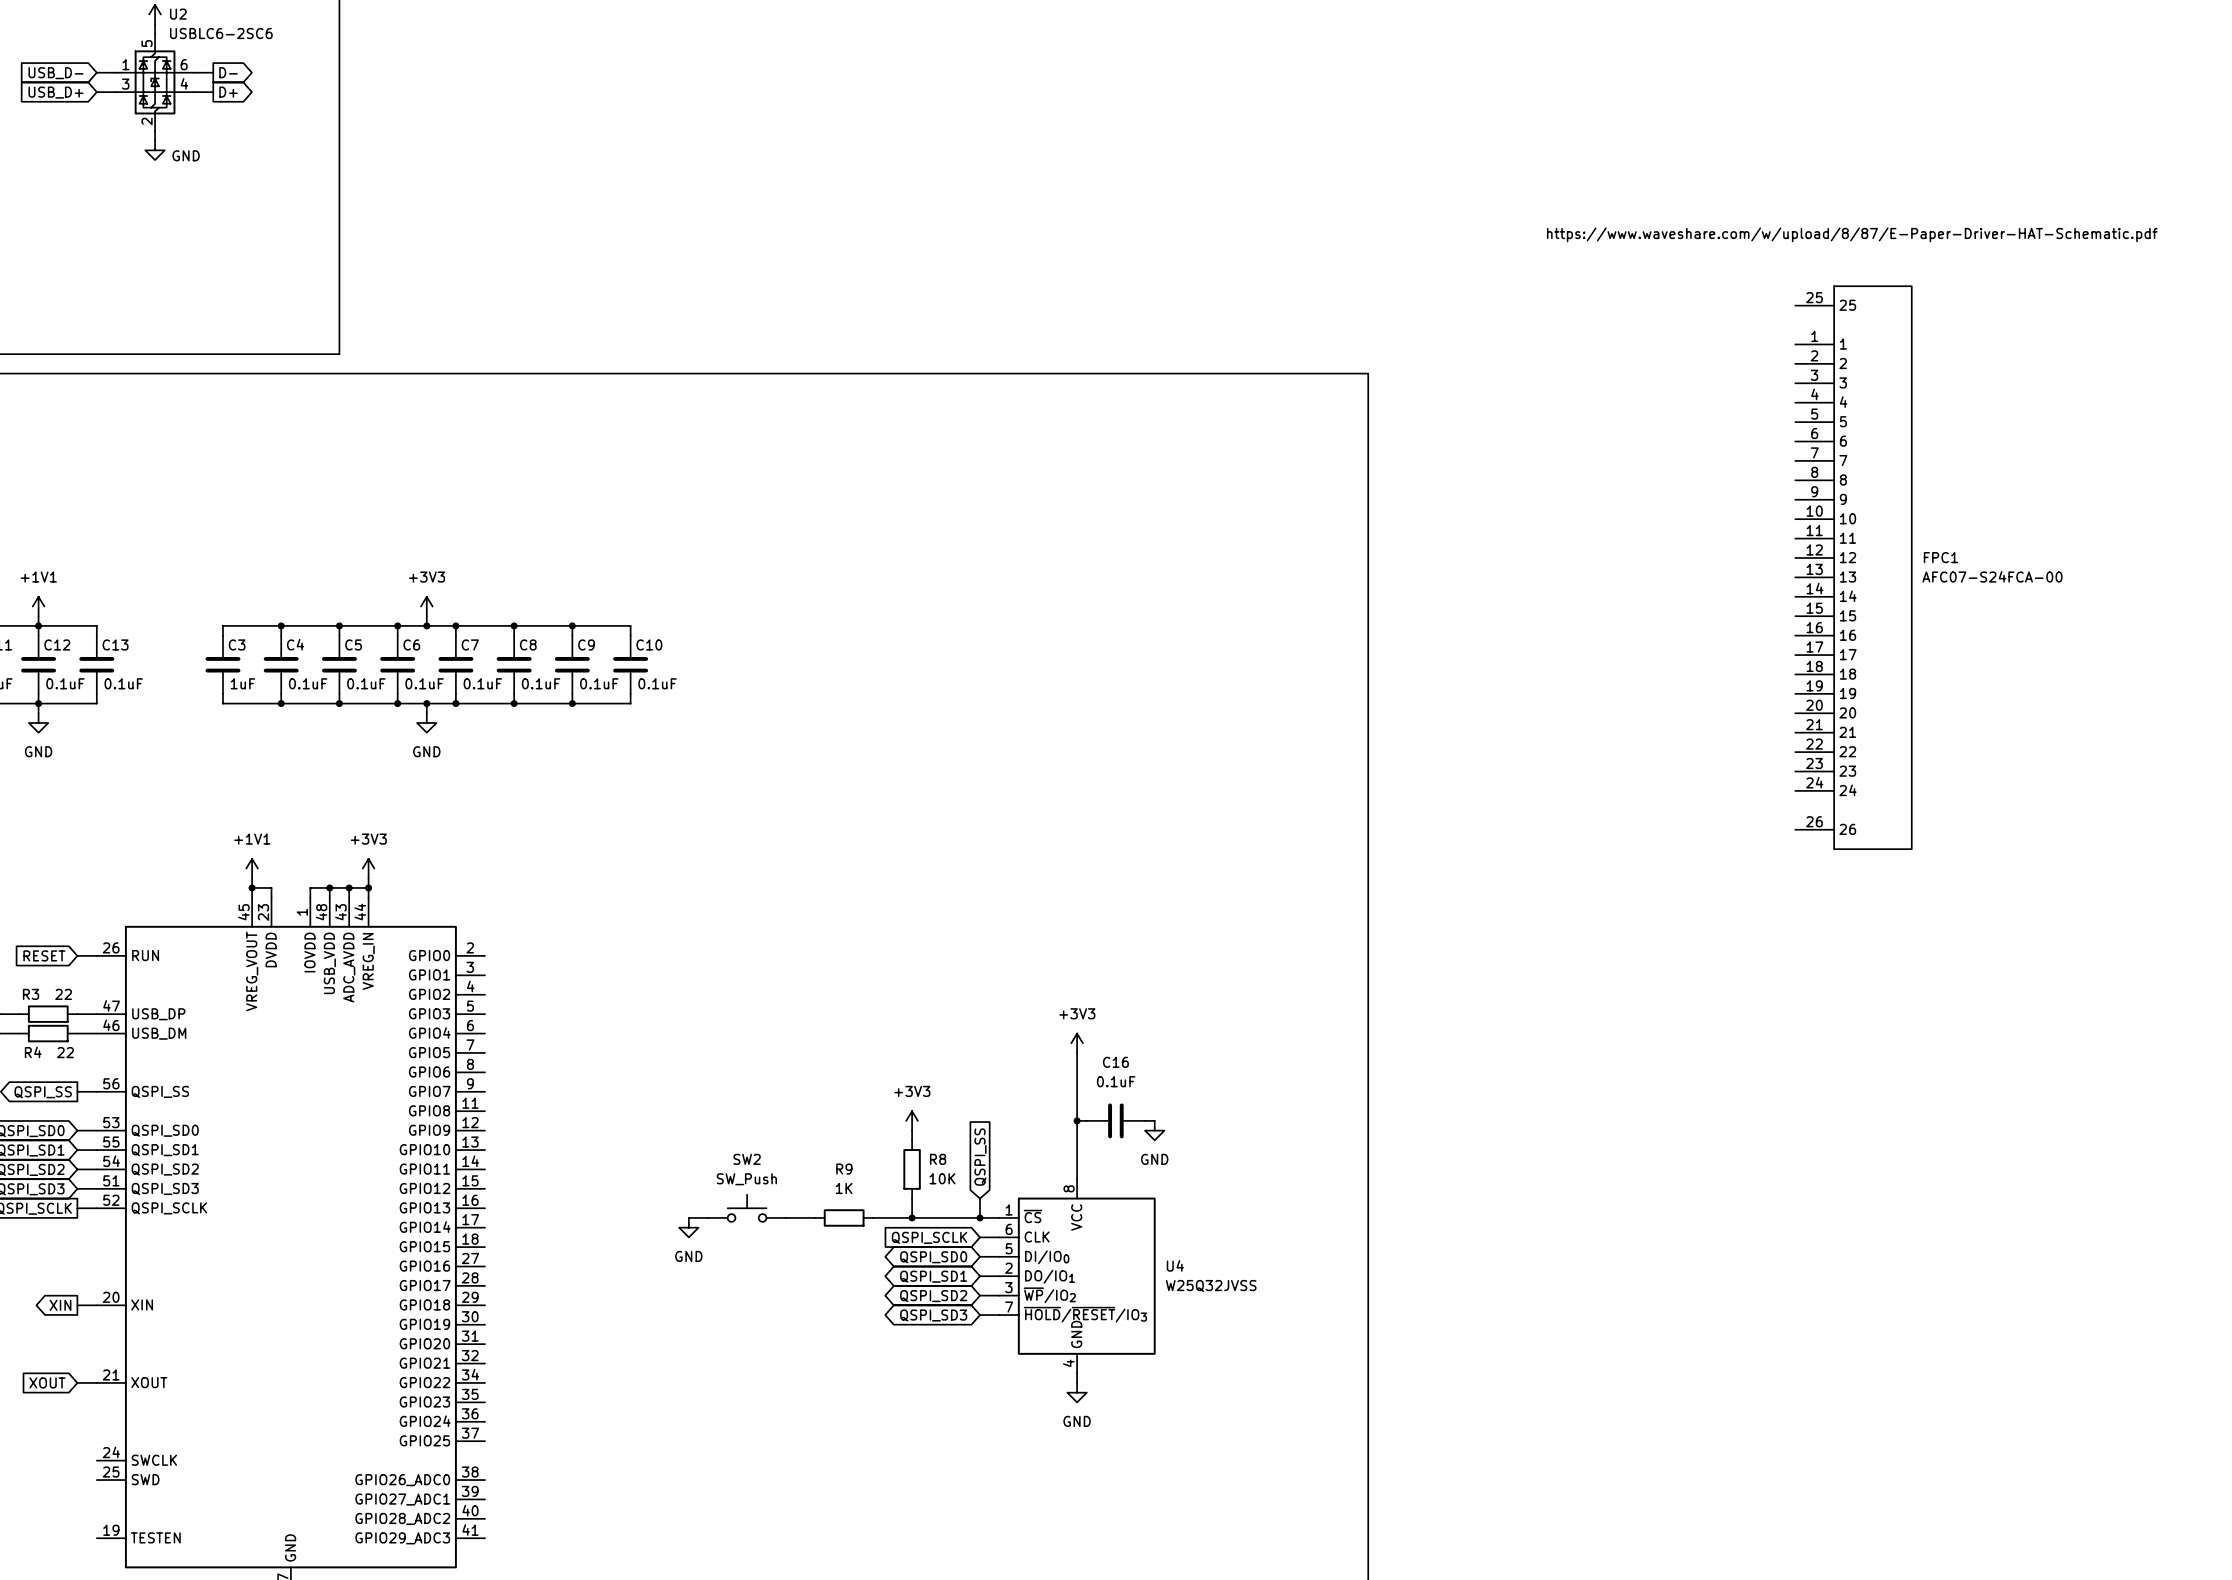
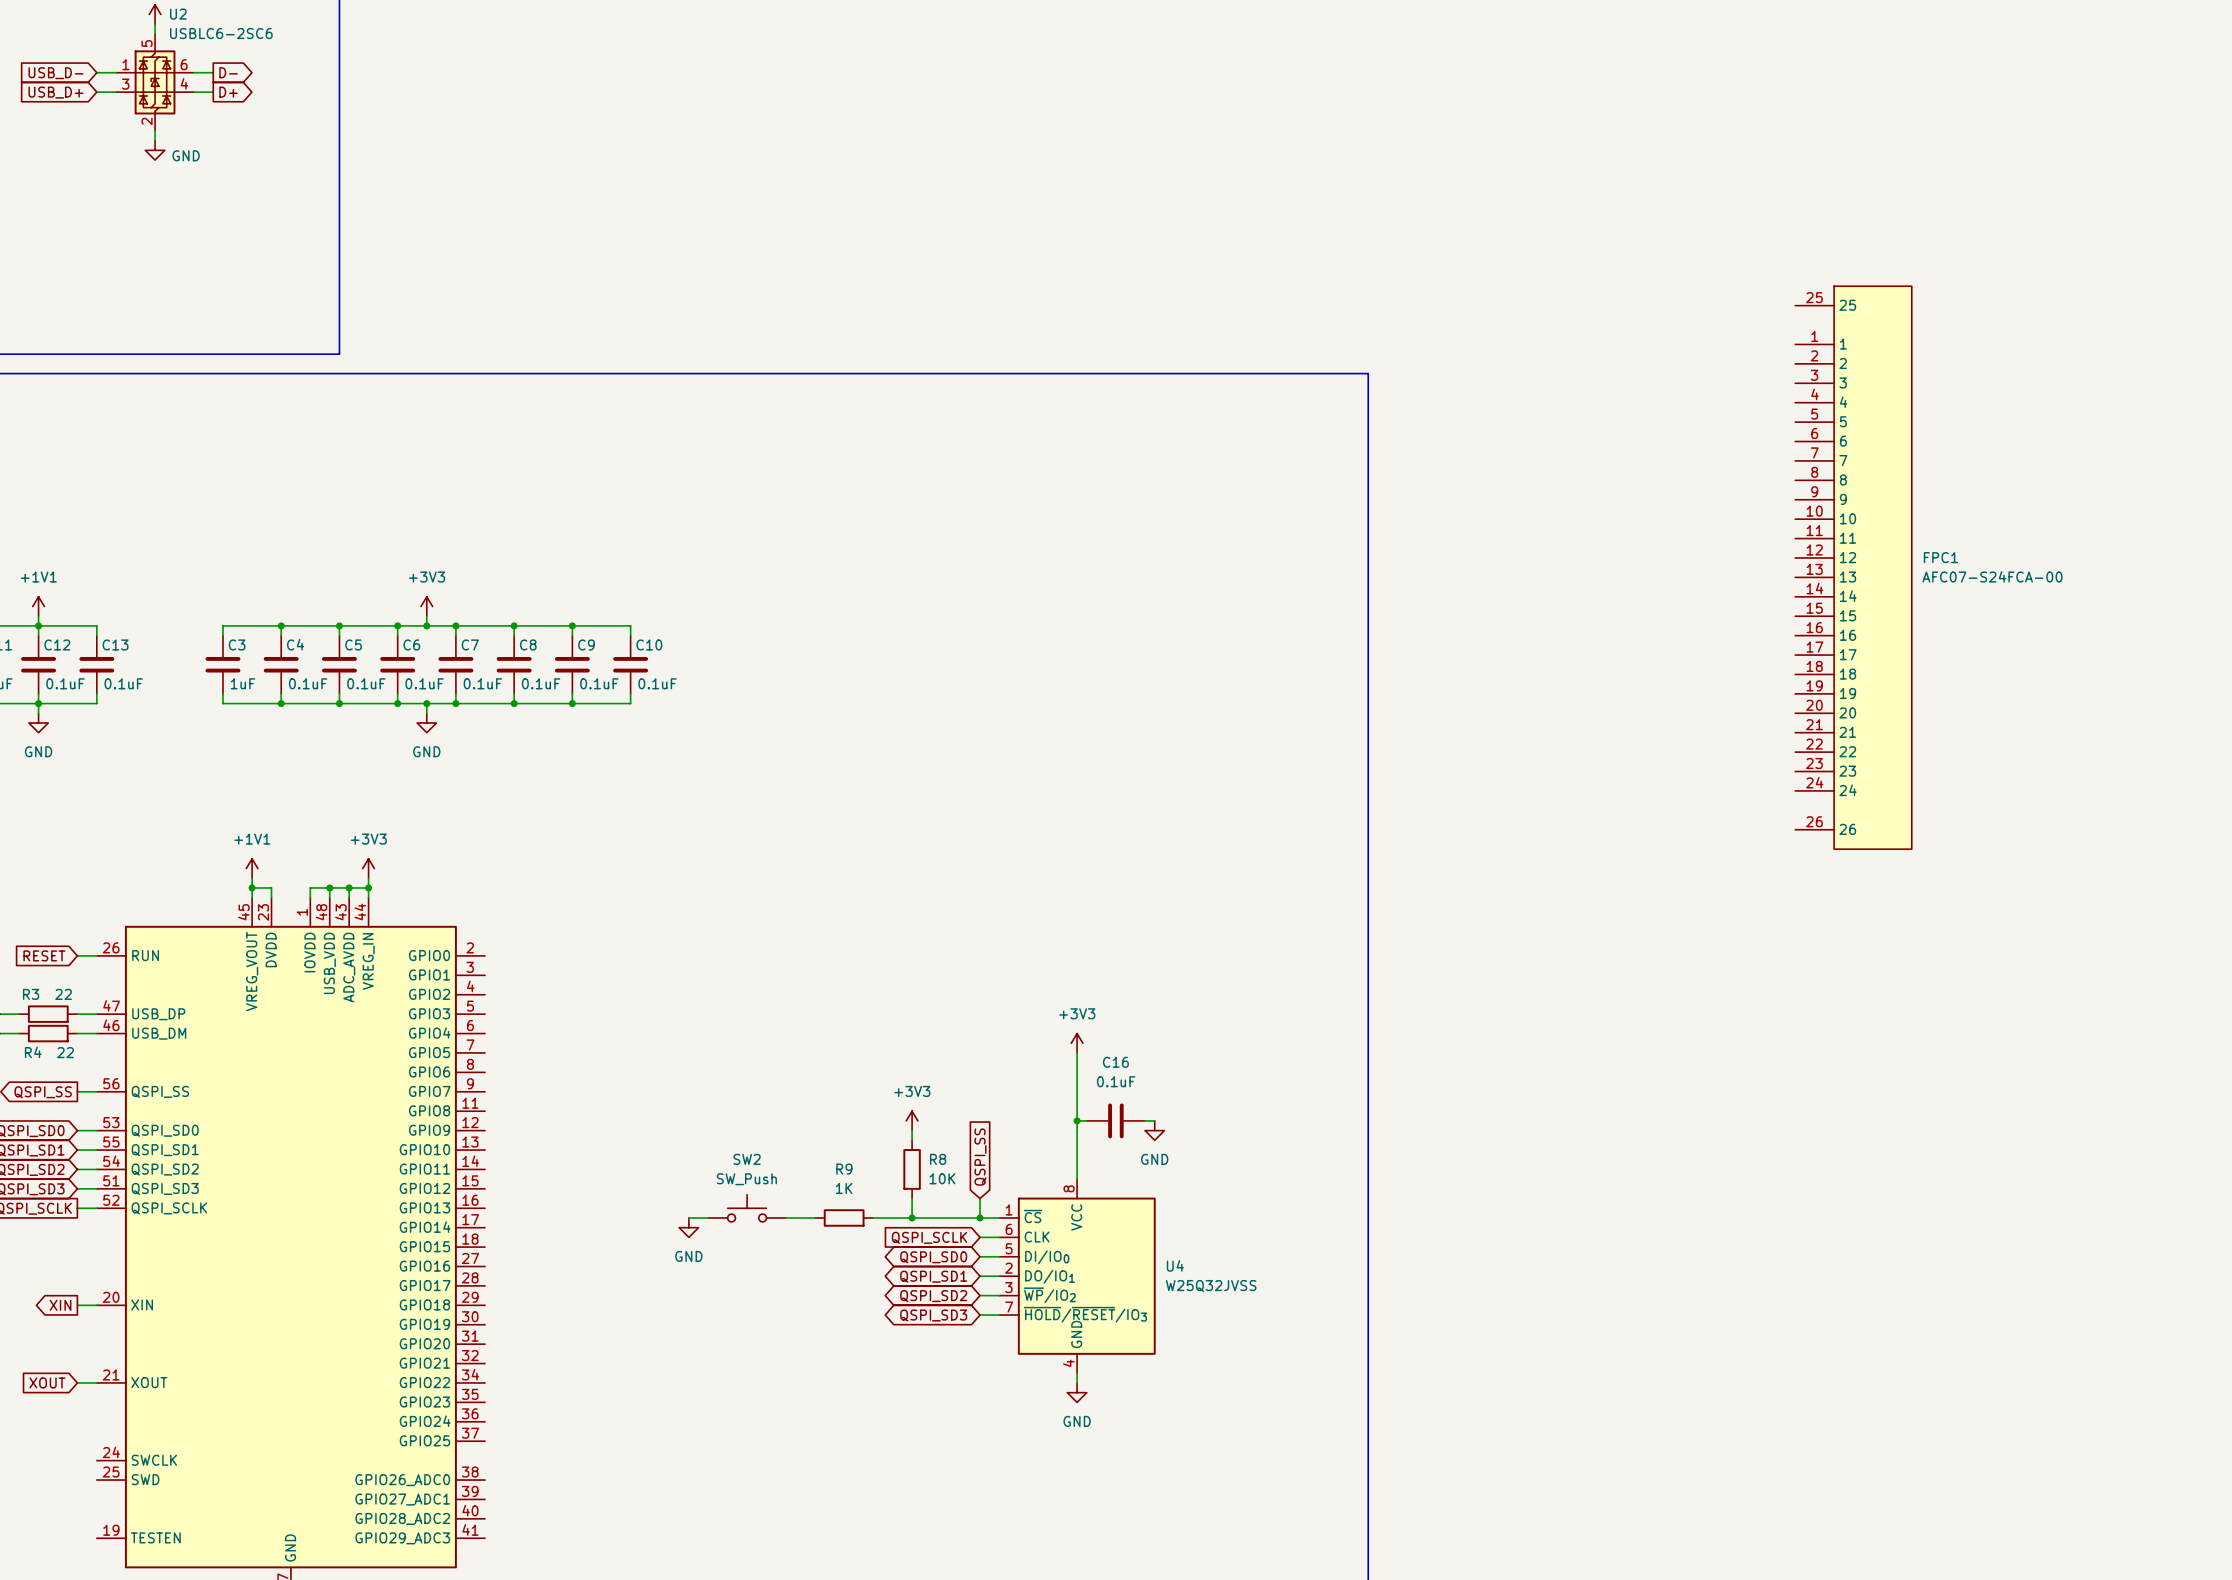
text: https://www.waveshare.com/w/upload/8/87/E-Paper-Driver-HAT-Schematic.pdf (1852, 234) -> none

